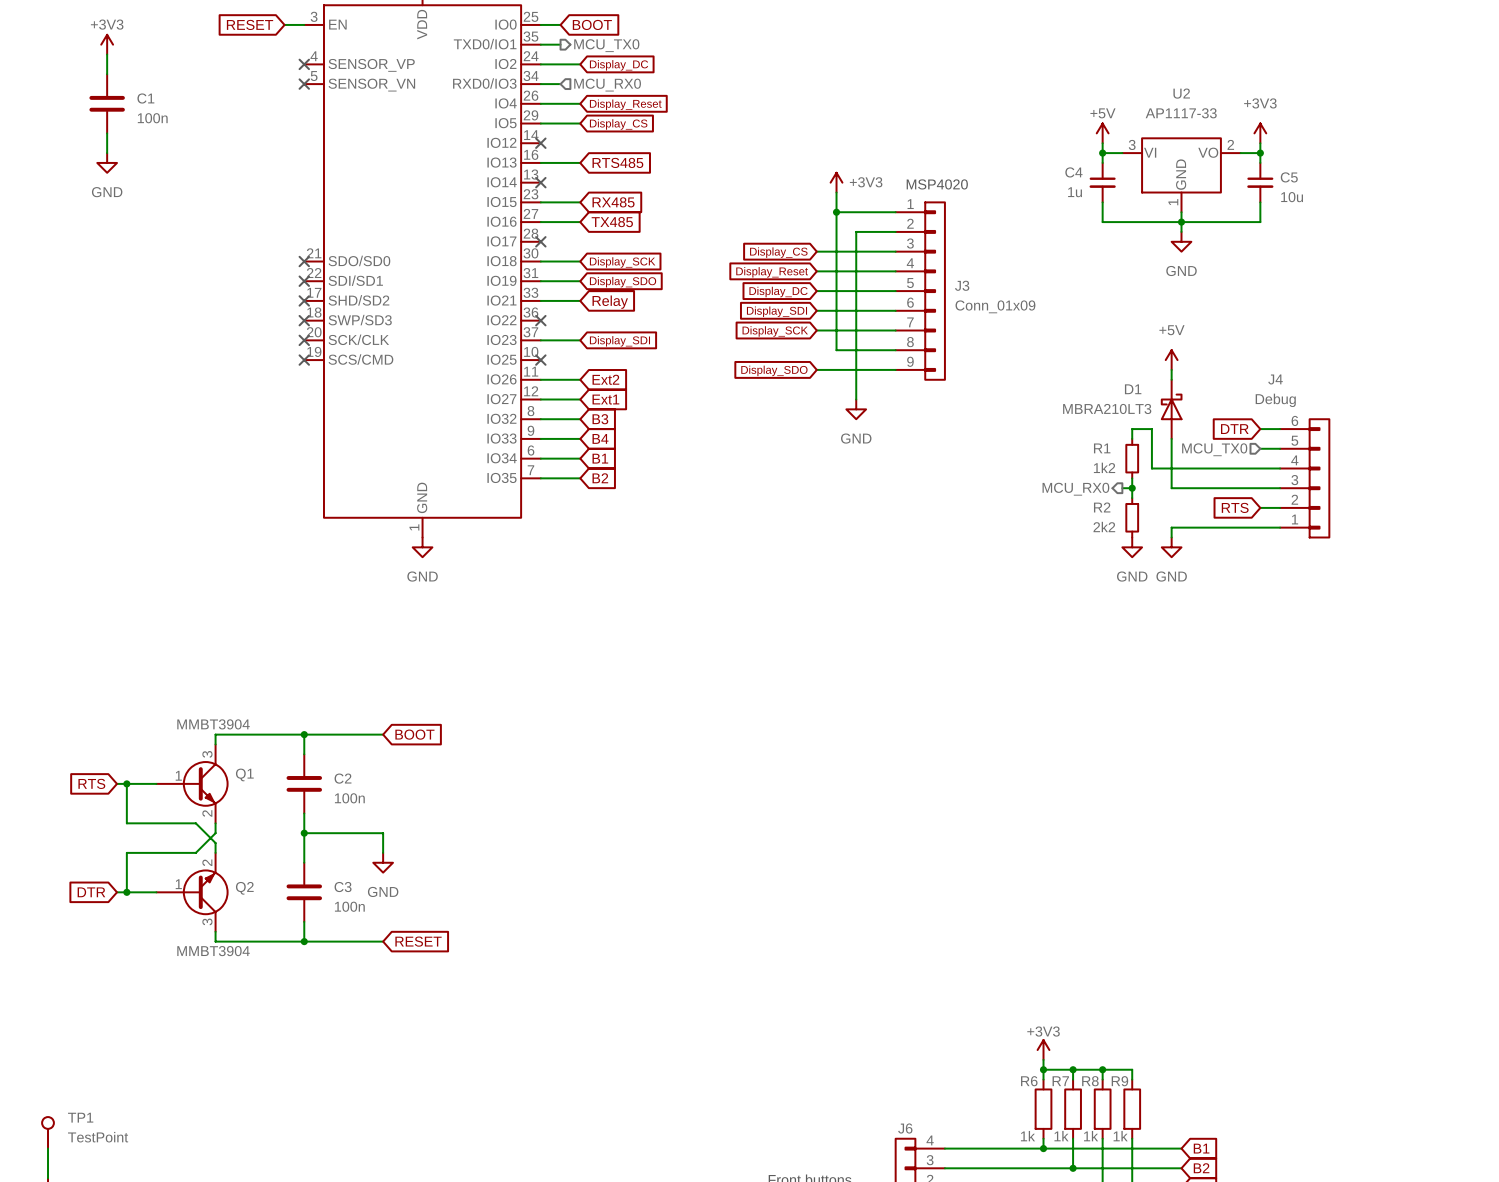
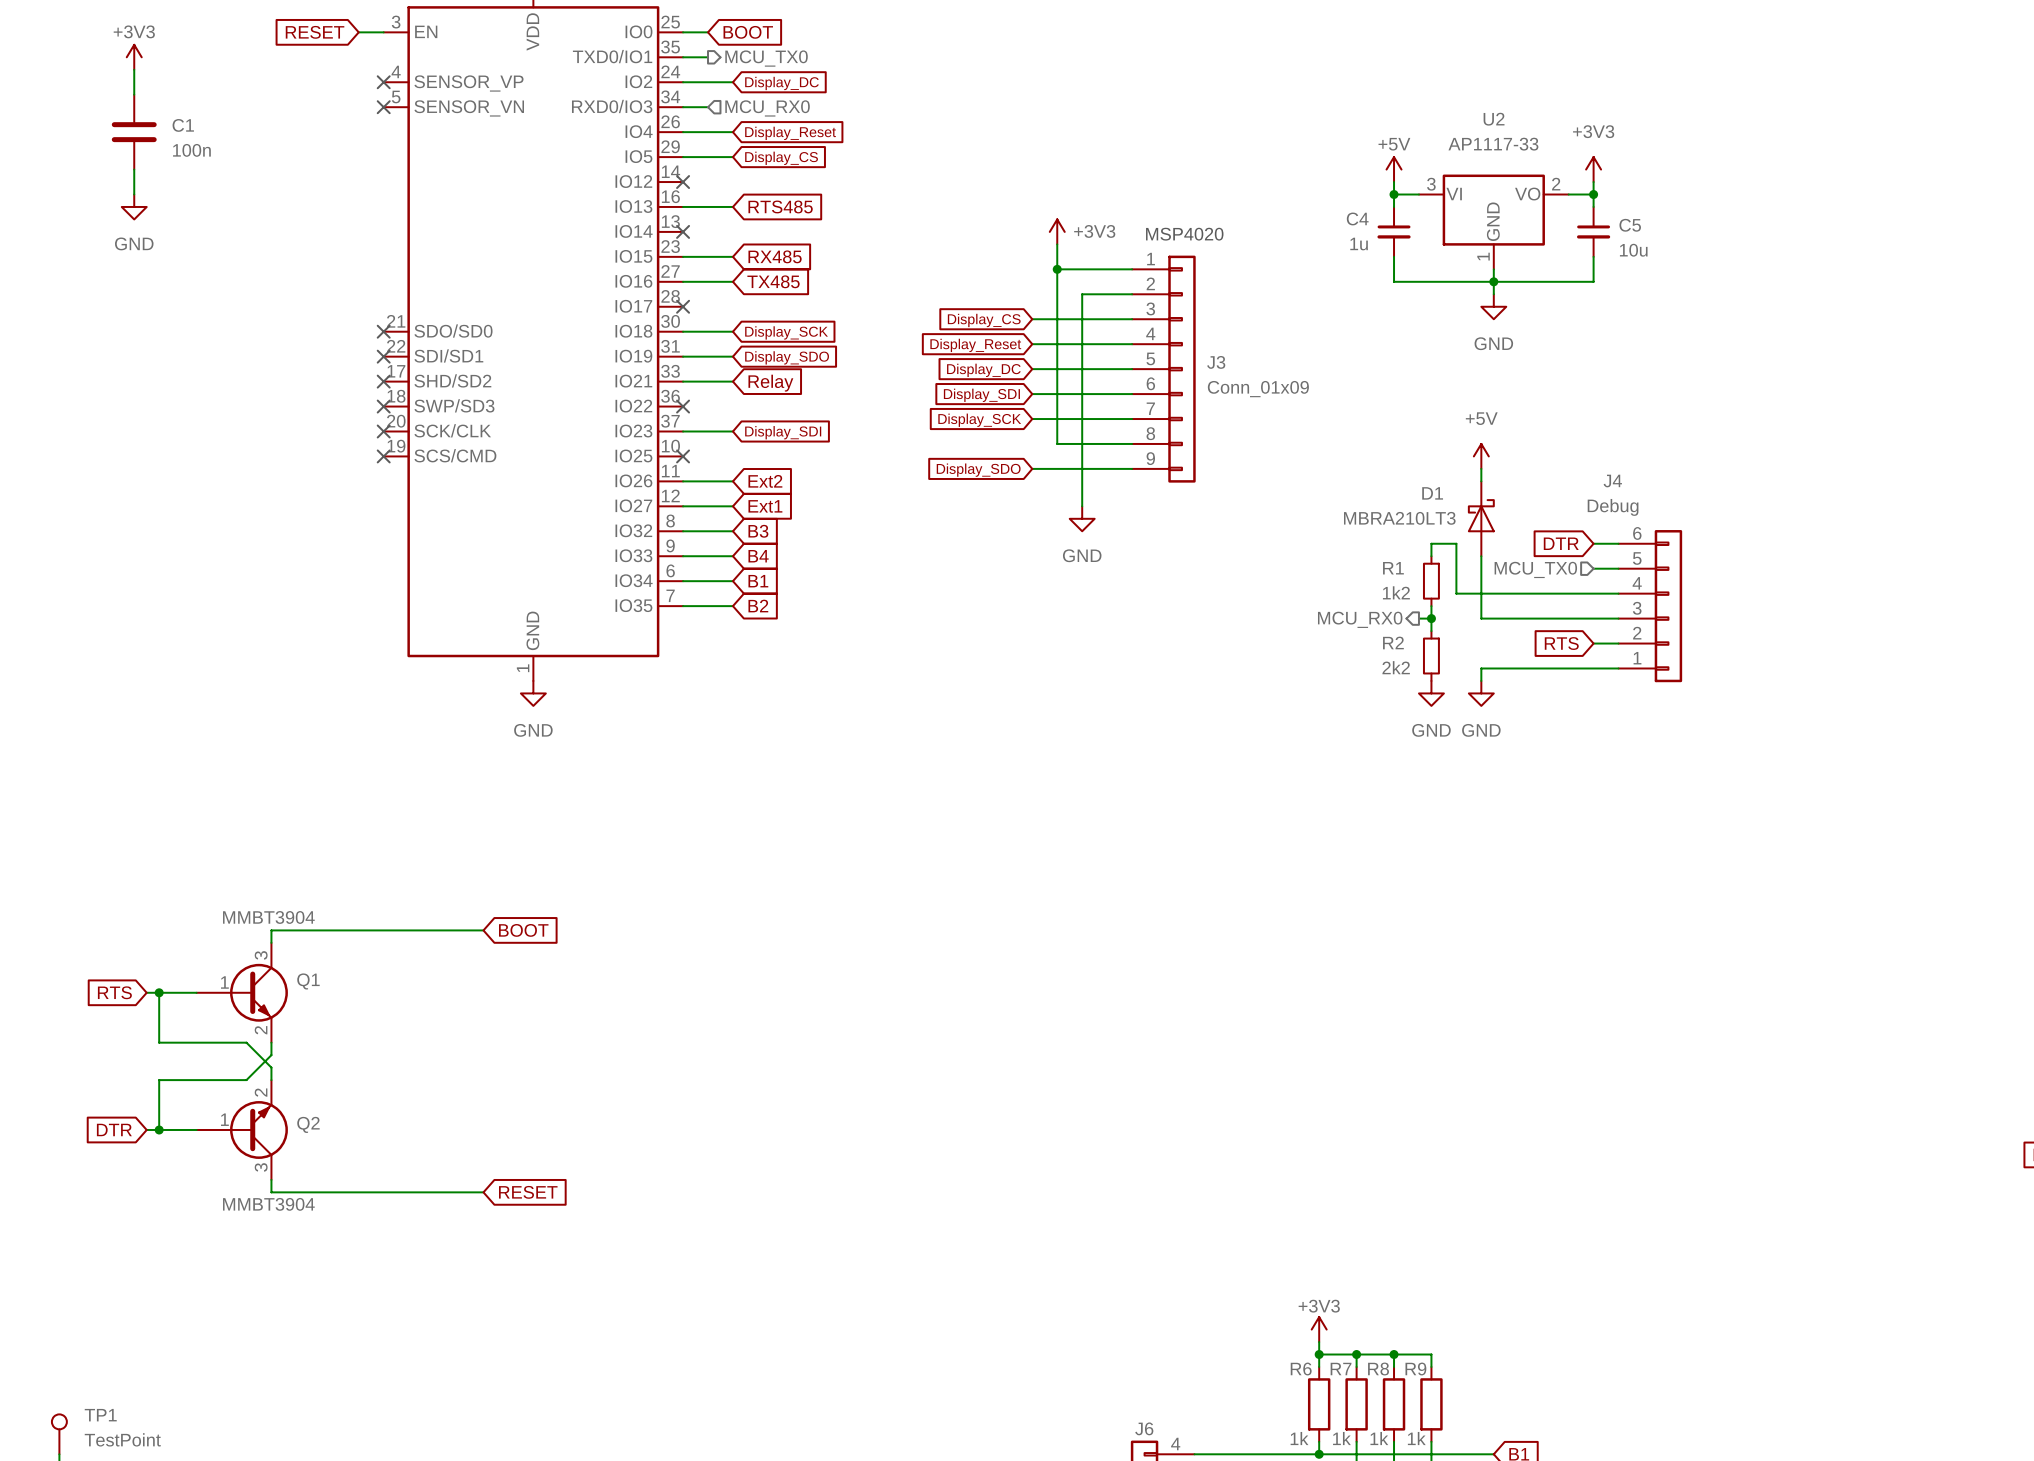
wire: (304, 734) (304, 754) -> none
junction: (304, 734) -> none
C2: 100n (304, 783) -> none
wire: (304, 813) (304, 862) -> none
wire: (304, 833) (383, 833) (383, 852) -> none
junction: (304, 833) -> none
power symbol: GND (383, 862) -> none
C3: 100n (304, 892) -> none
wire: (304, 921) (304, 941) -> none
junction: (304, 941) -> none

